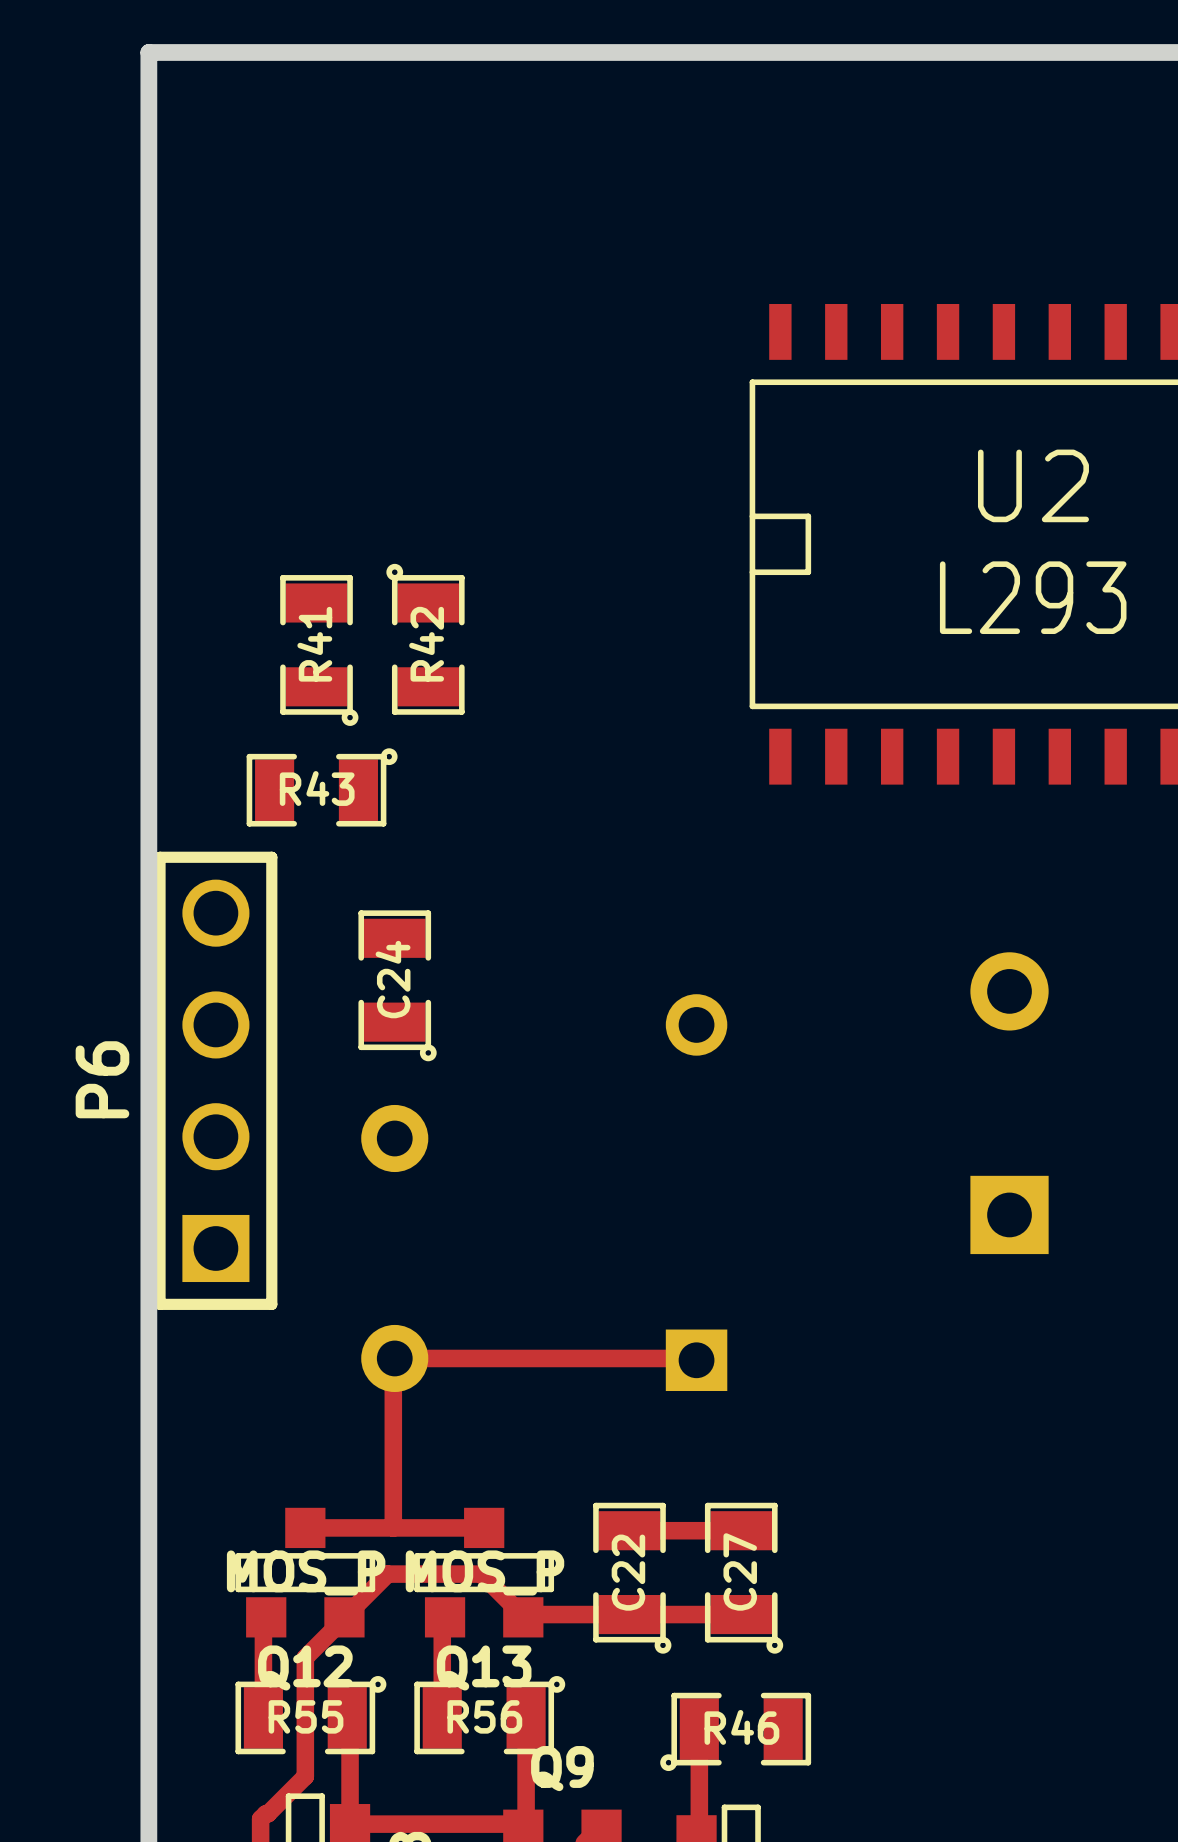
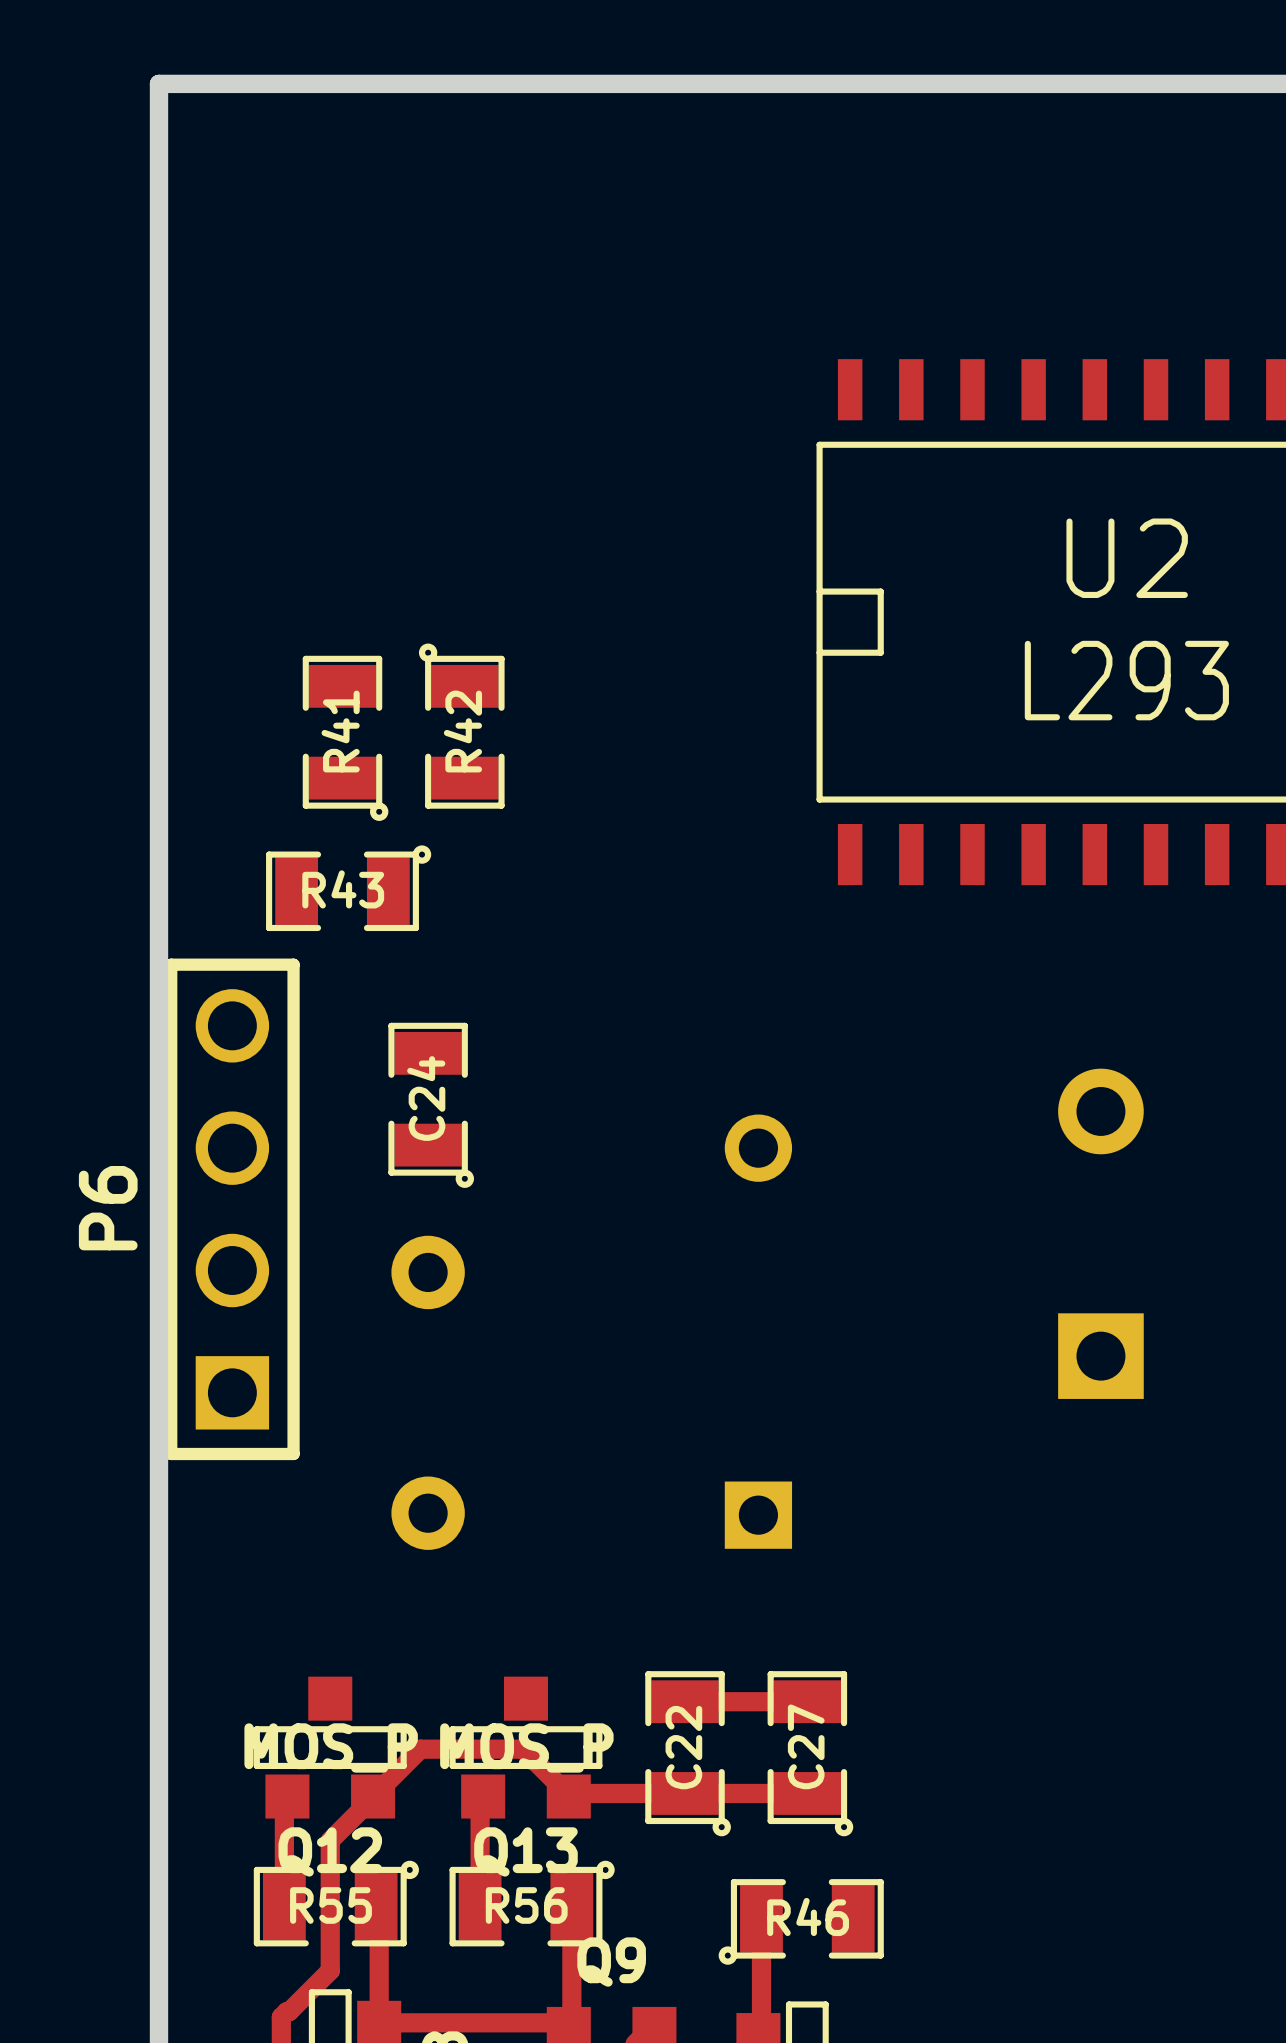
top track: (696, 1360) (694, 1358) (394, 1358) (393, 1527) -> none
top track: (305, 1527) (484, 1527) -> none

